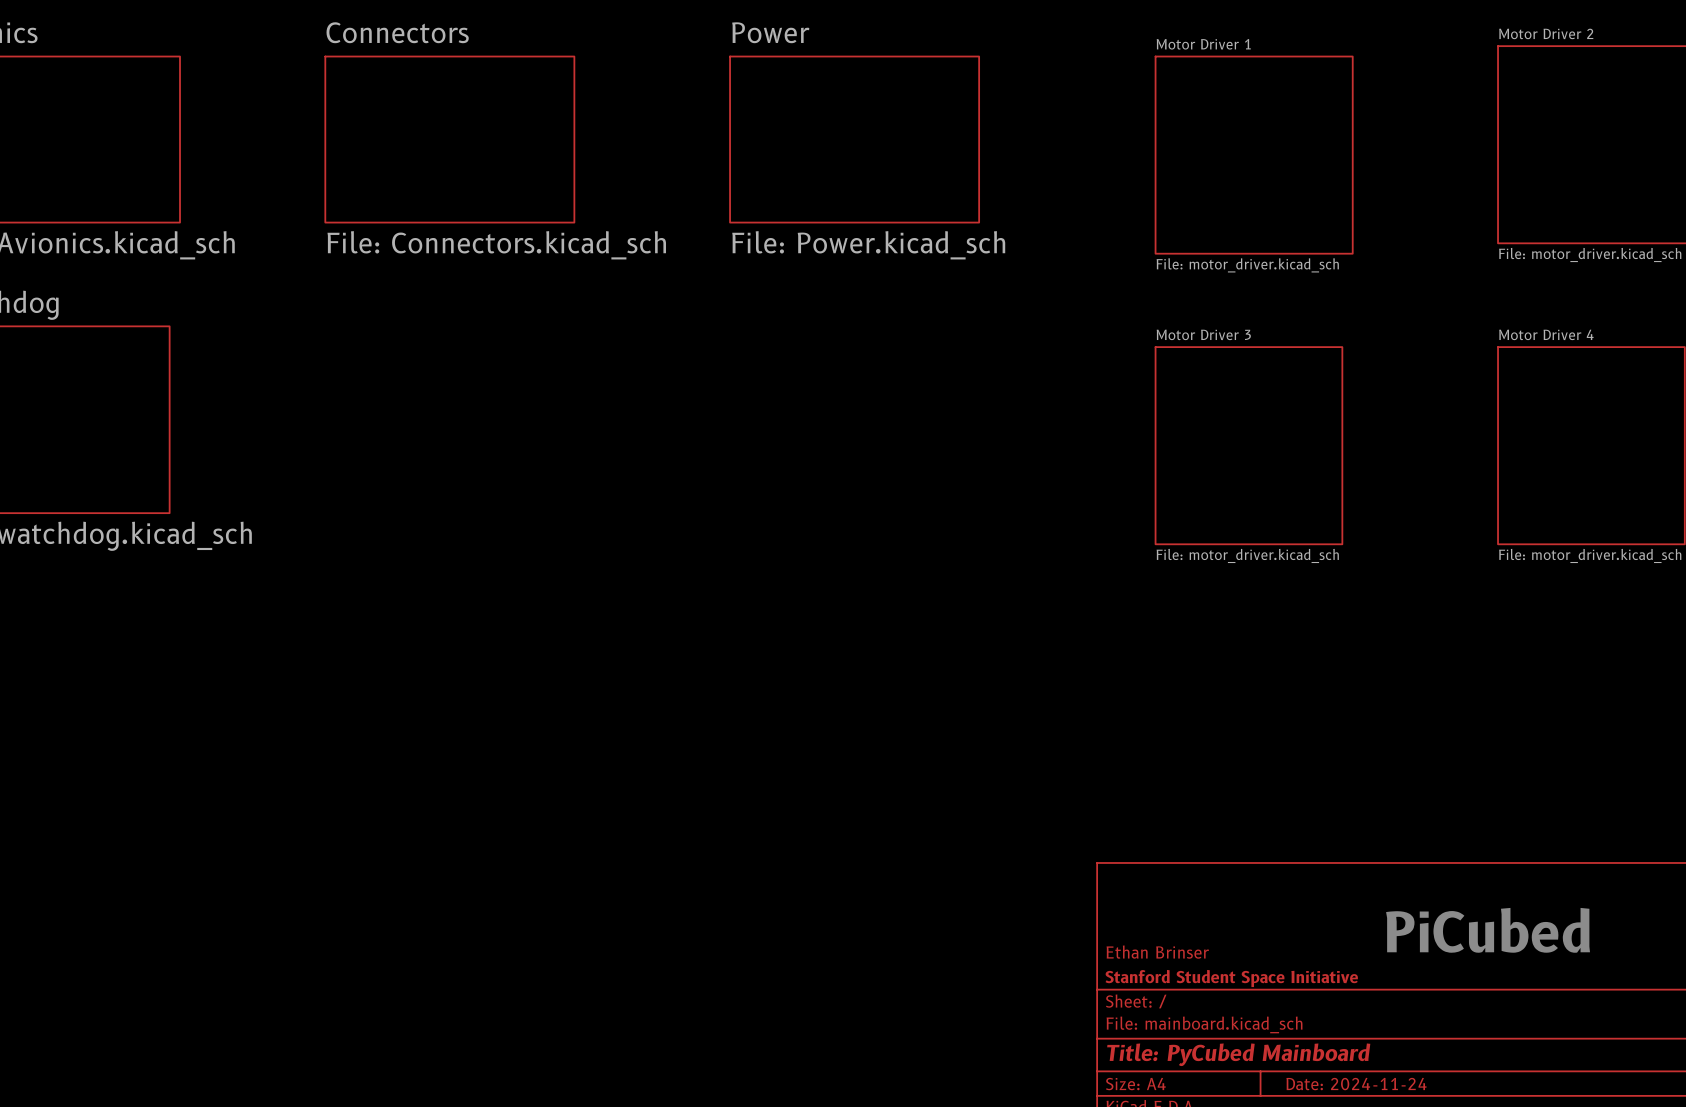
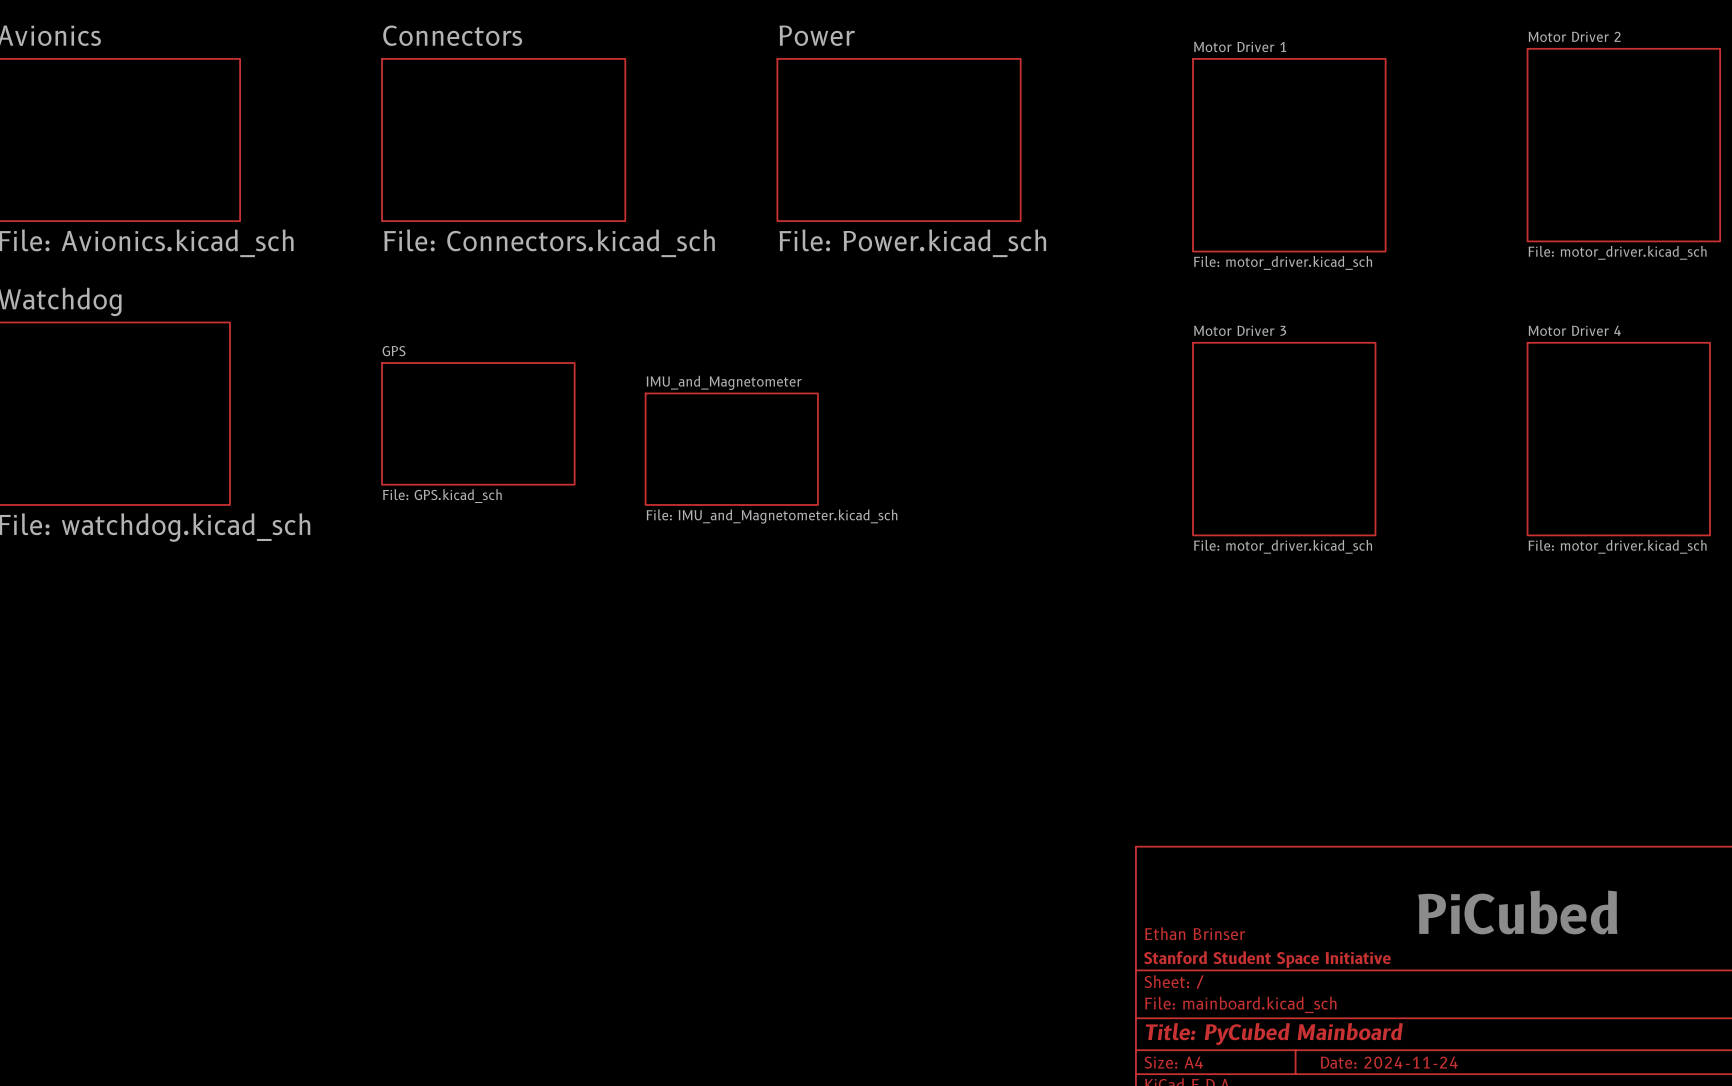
sheet GPS: none -> File: GPS.kicad_sch (478, 423)
sheet IMU_and_Magnetometer: none -> File: IMU_and_Magnetometer.kicad_sch (731, 449)

